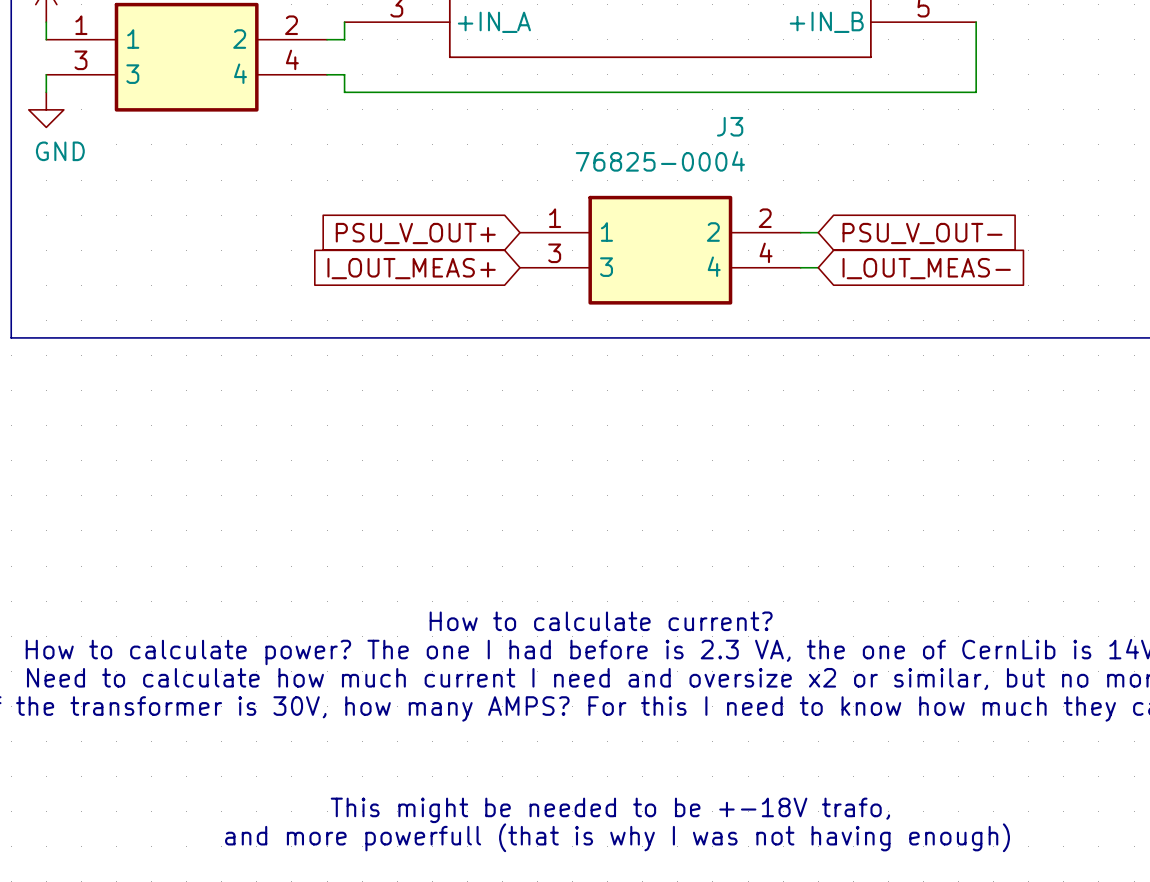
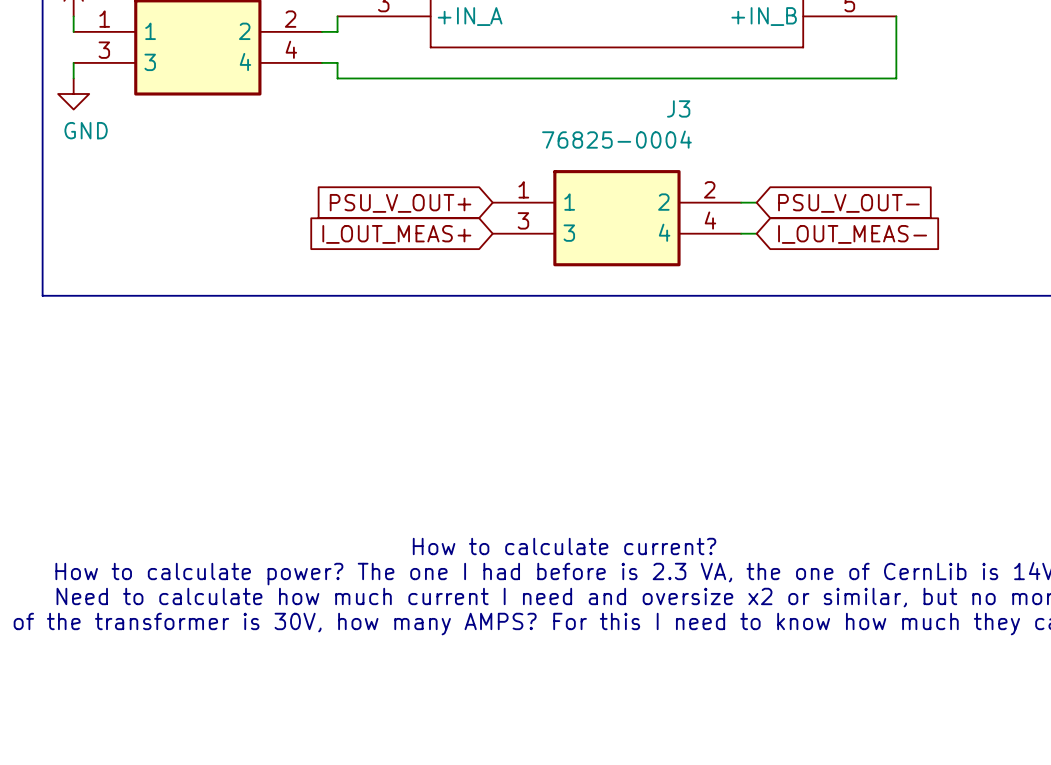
text: This might be needed to be +-18V trafo, (610, 810) -> none
text: and more powerfull (that is why I was not having enough) (617, 837) -> none

